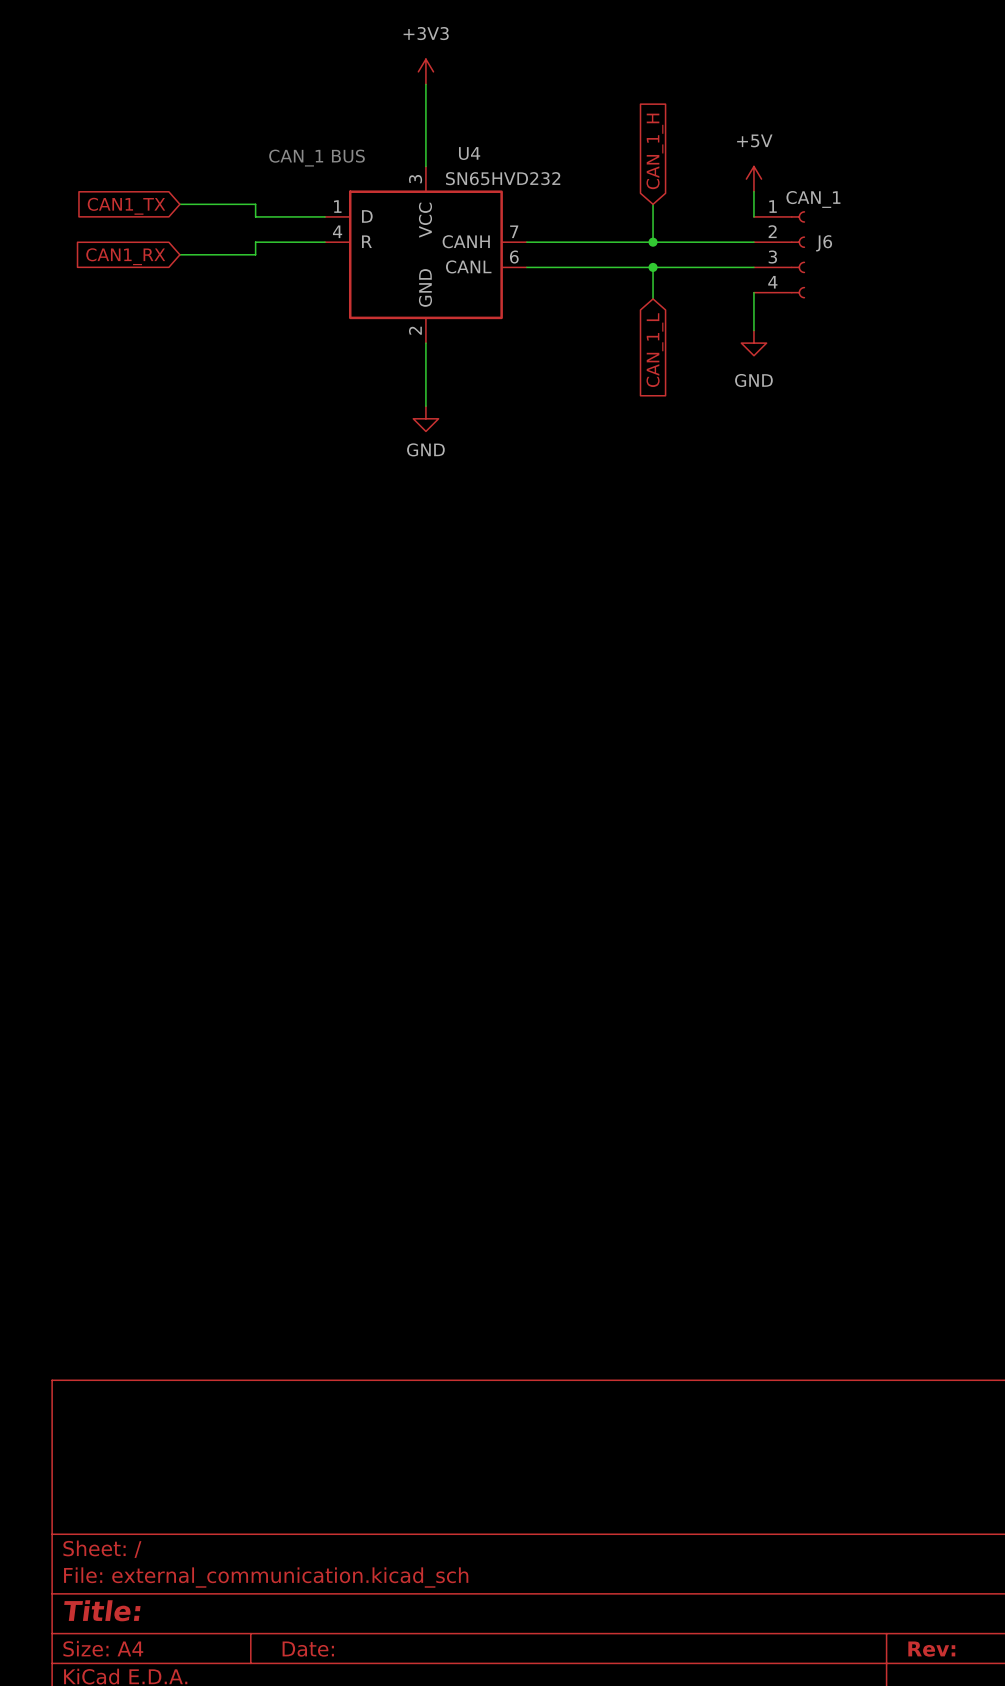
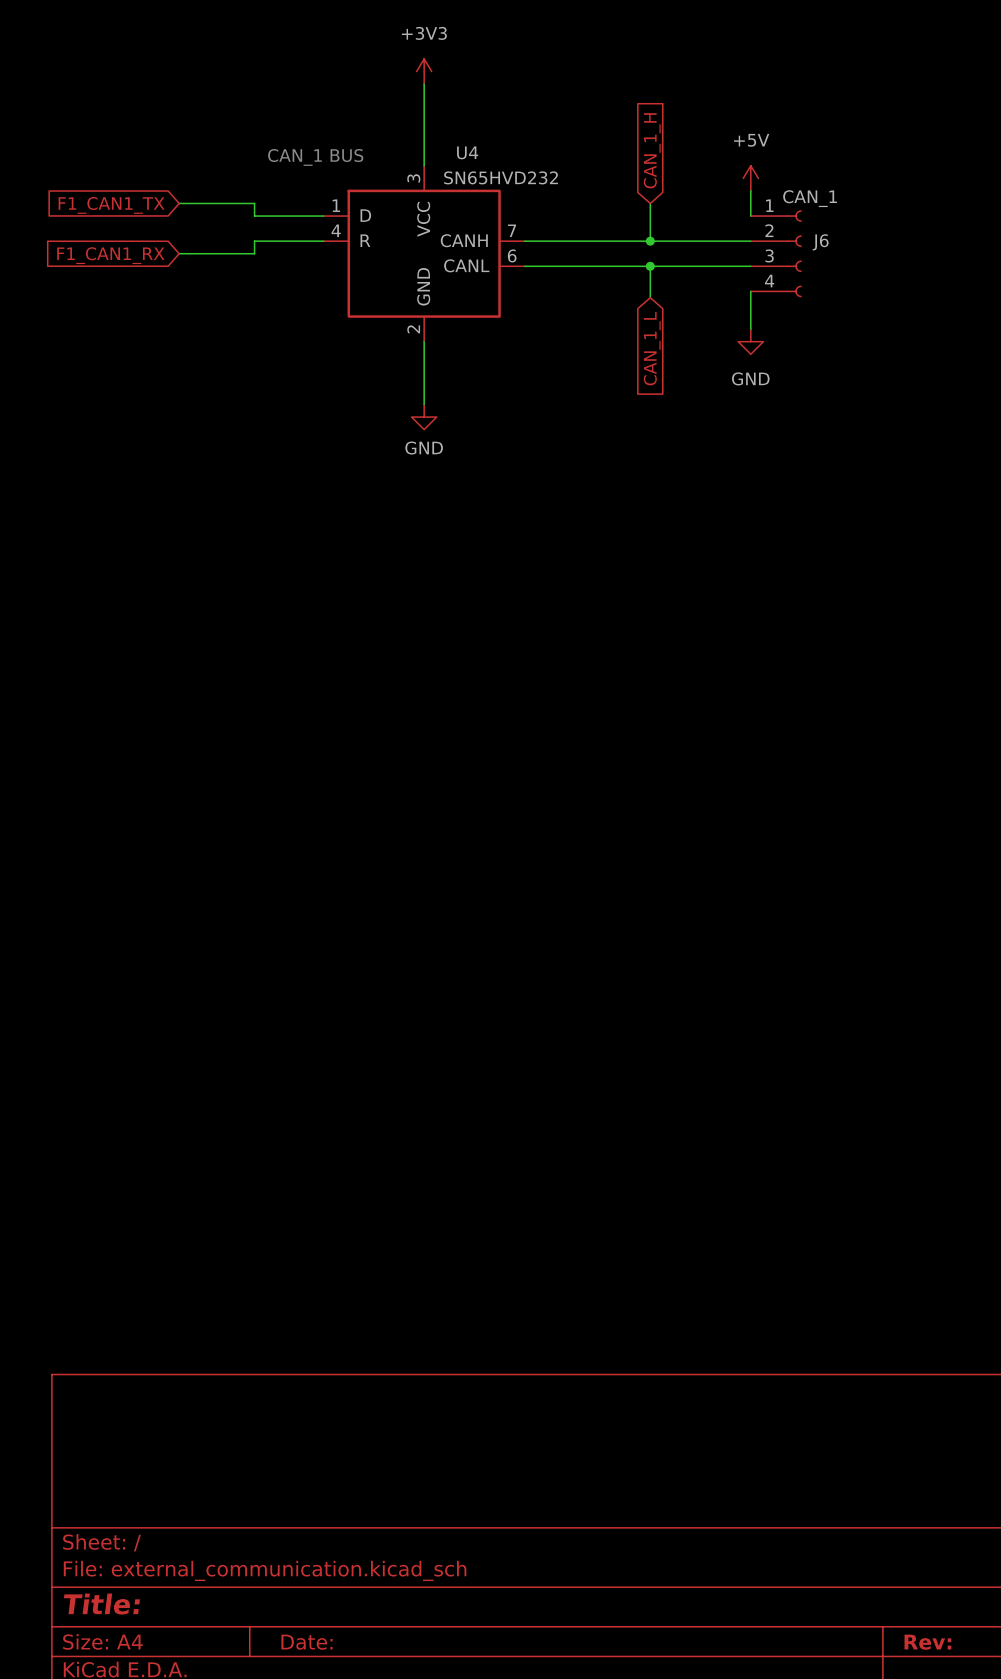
global label: CAN1_TX (126, 206) -> F1_CAN1_TX (111, 205)
global label: CAN1_RX (125, 256) -> F1_CAN1_RX (110, 255)

